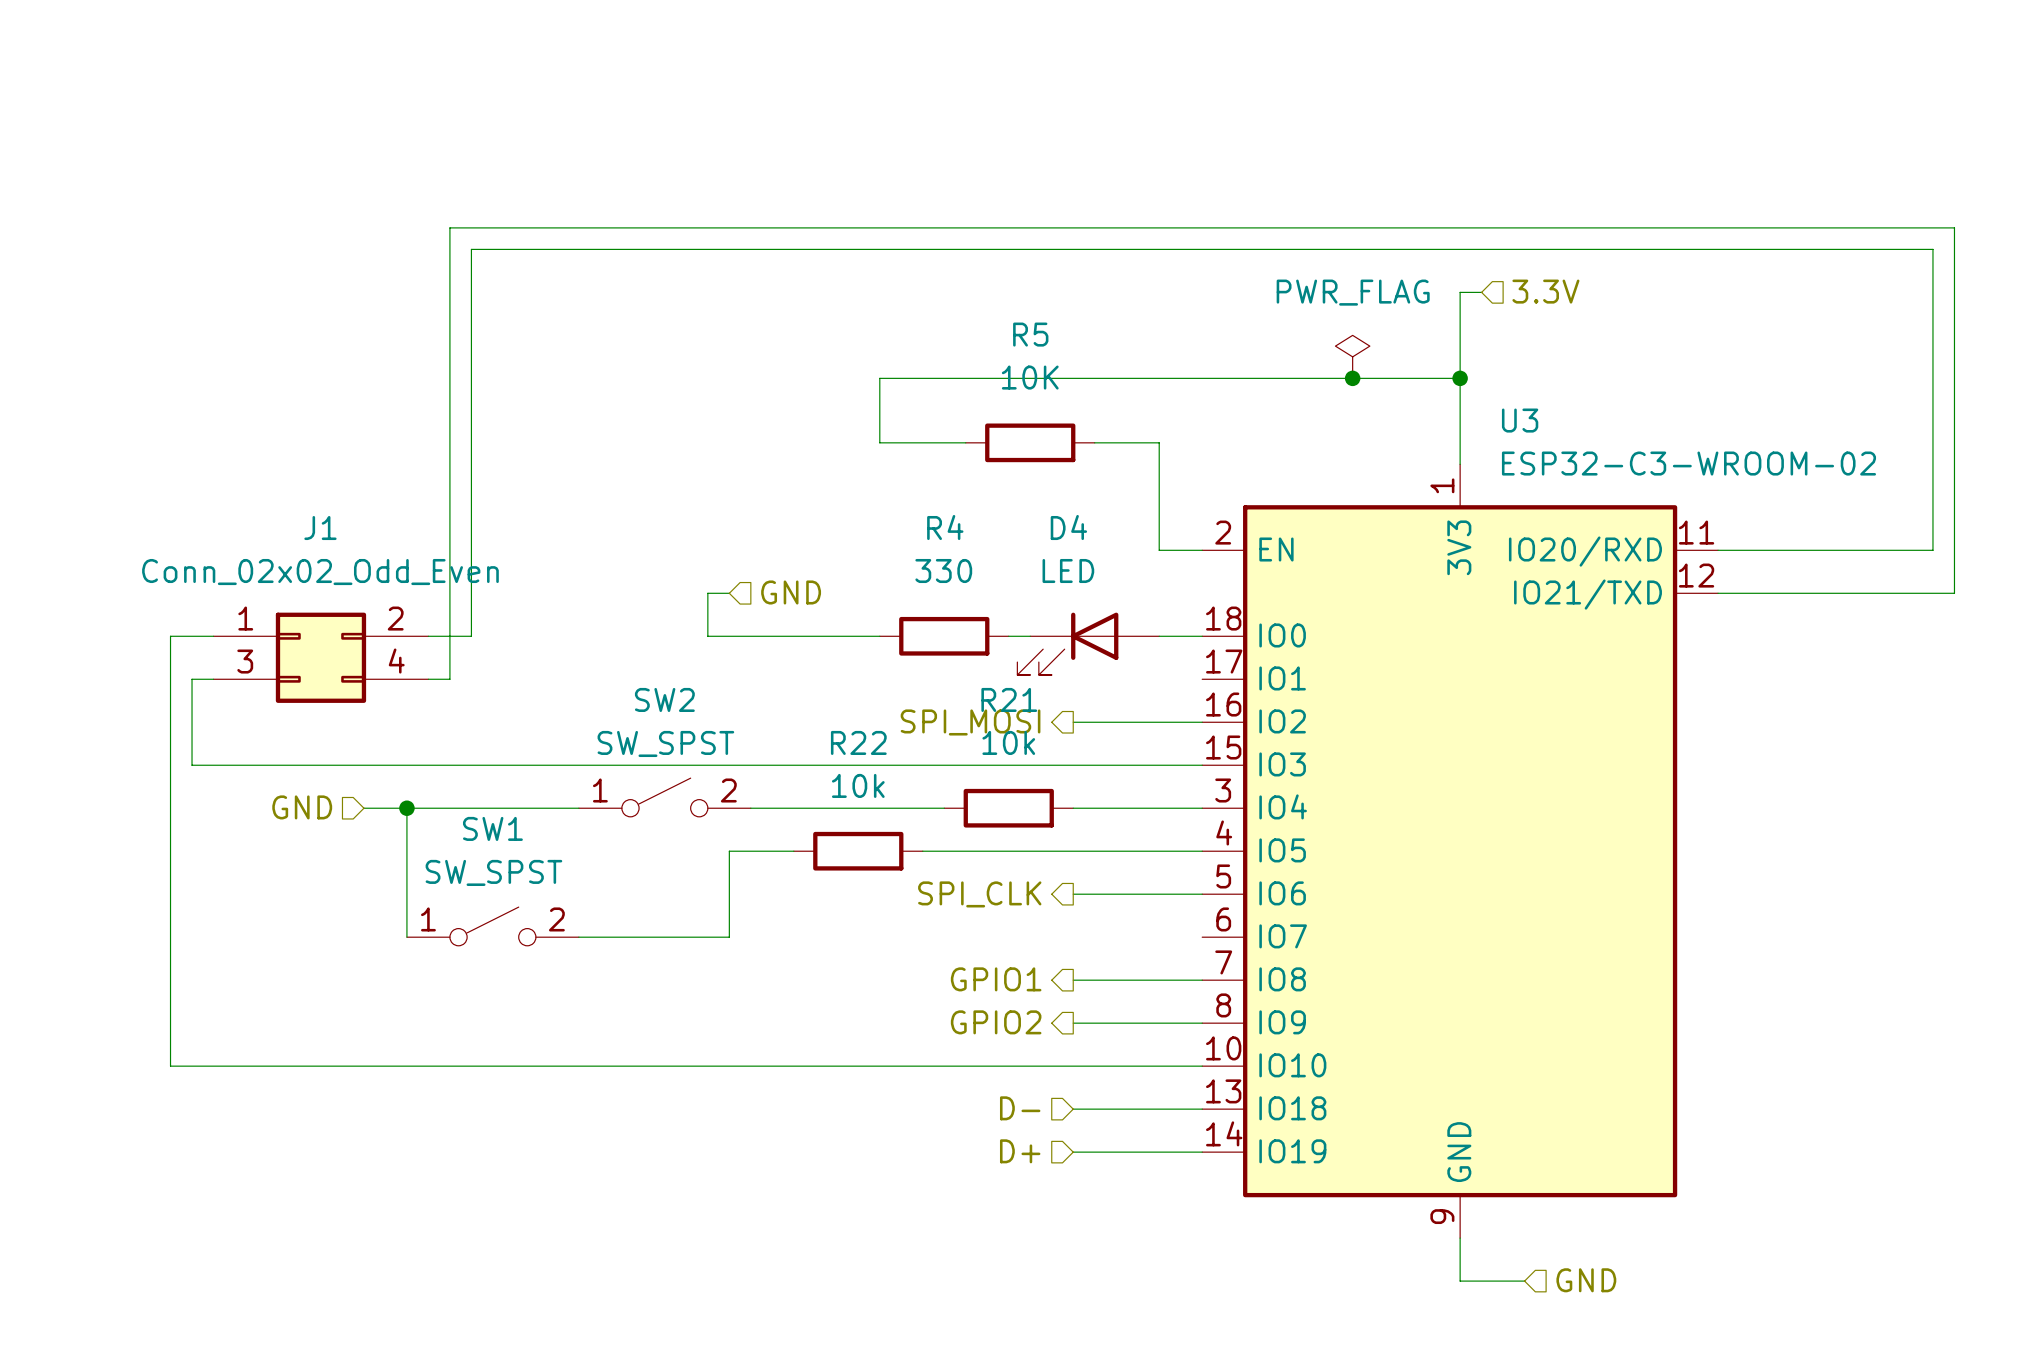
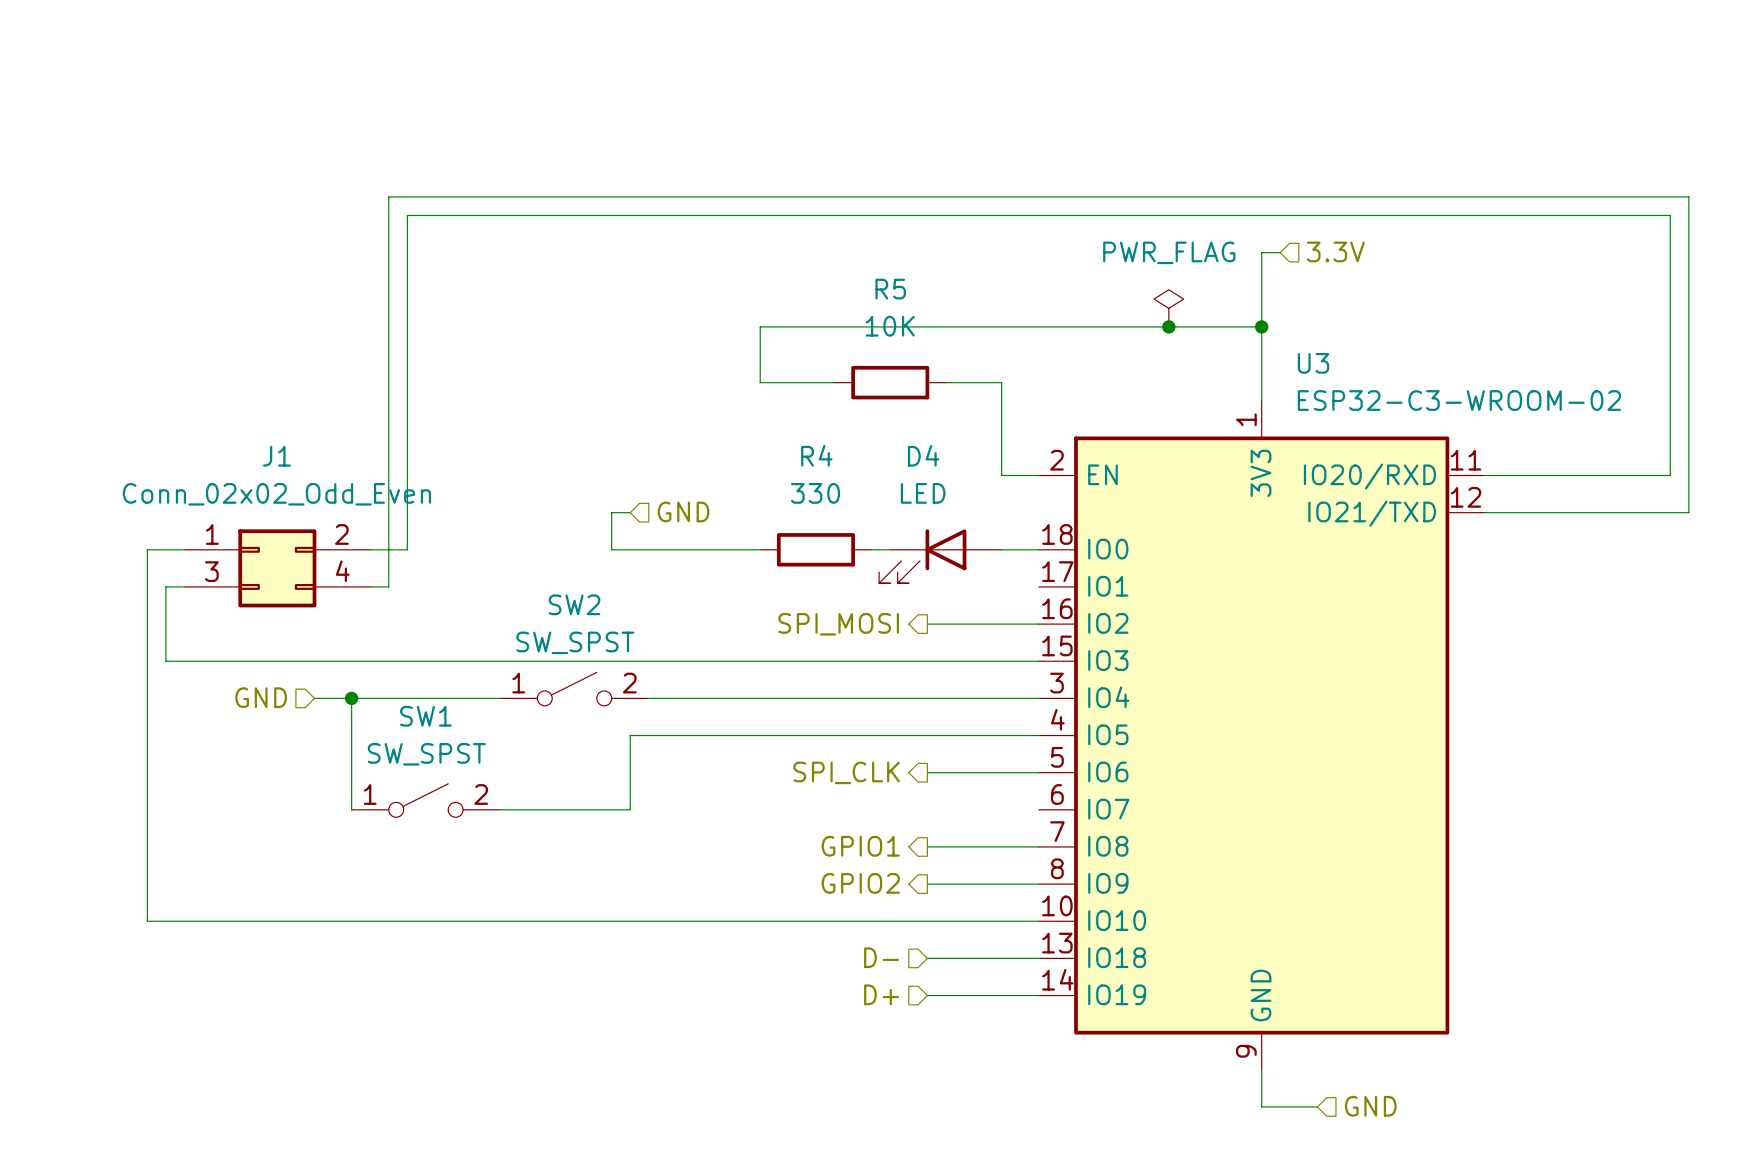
wire: none -> (815, 698) (927, 698)
R21: 10k (1008, 808) -> none
wire: none -> (685, 735) (797, 735)
R22: 10k (858, 851) -> none

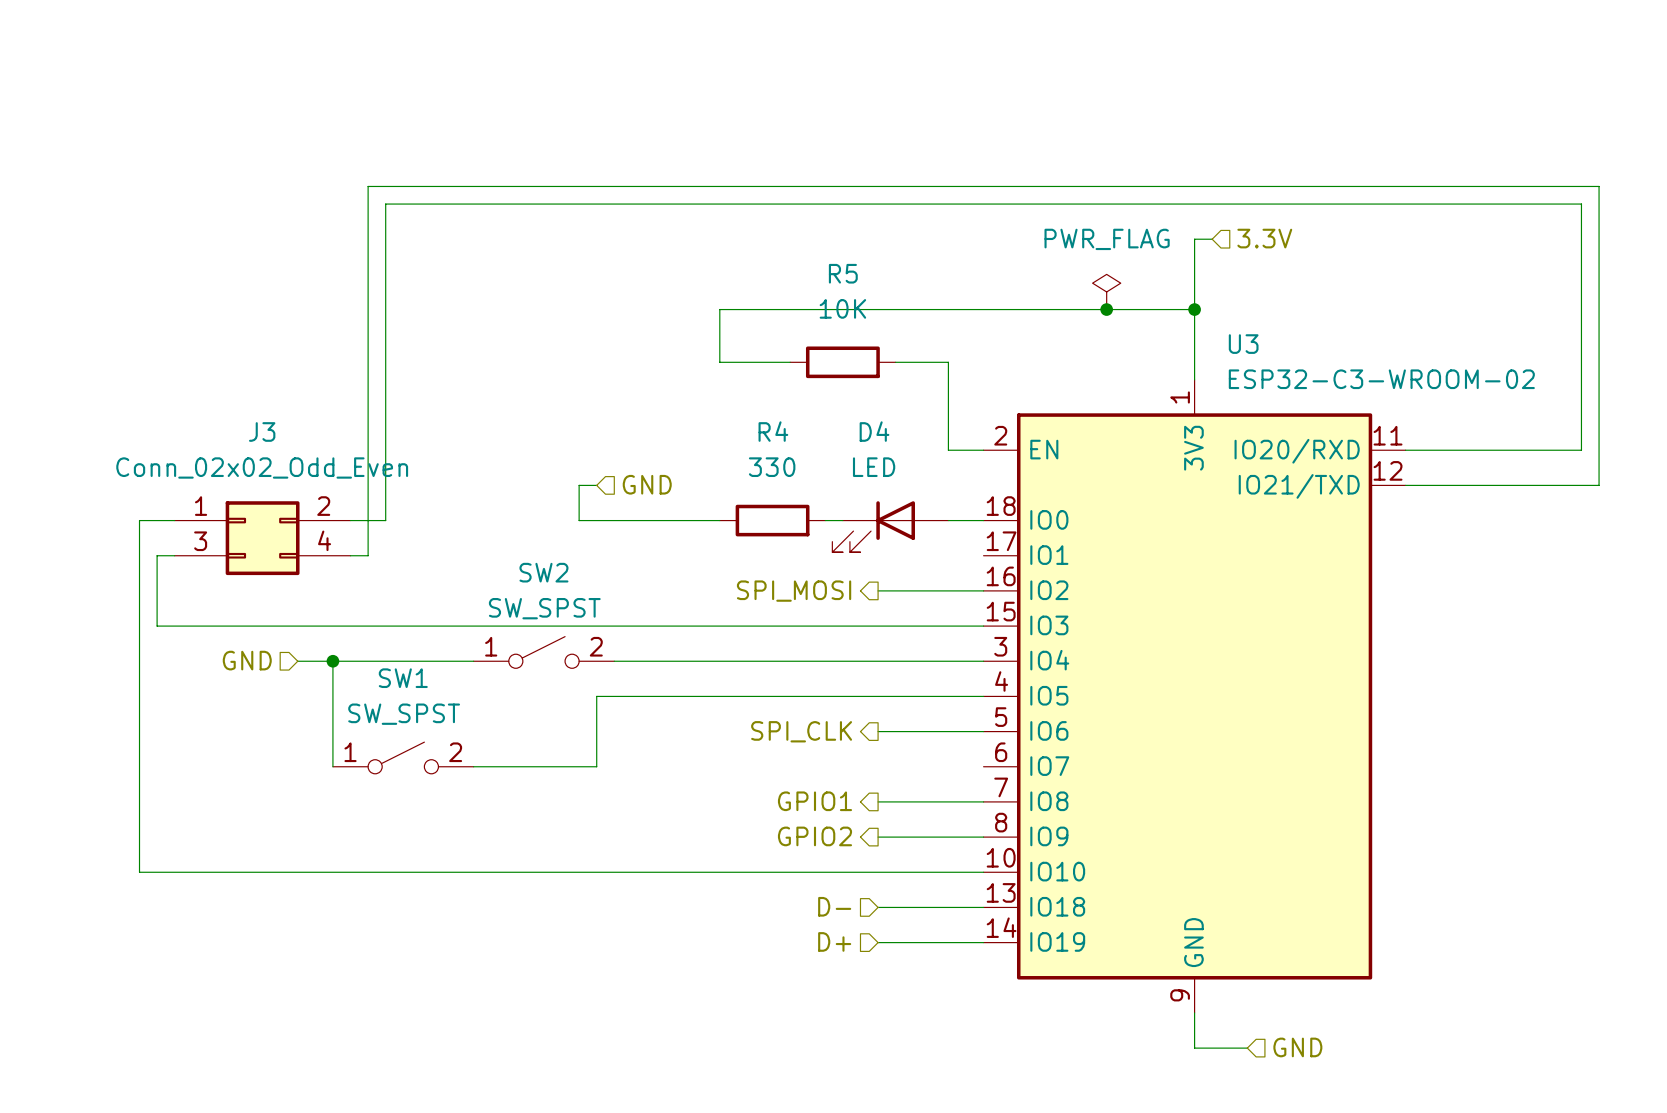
J1 name: J1 (276, 456) -> J3 (262, 431)

